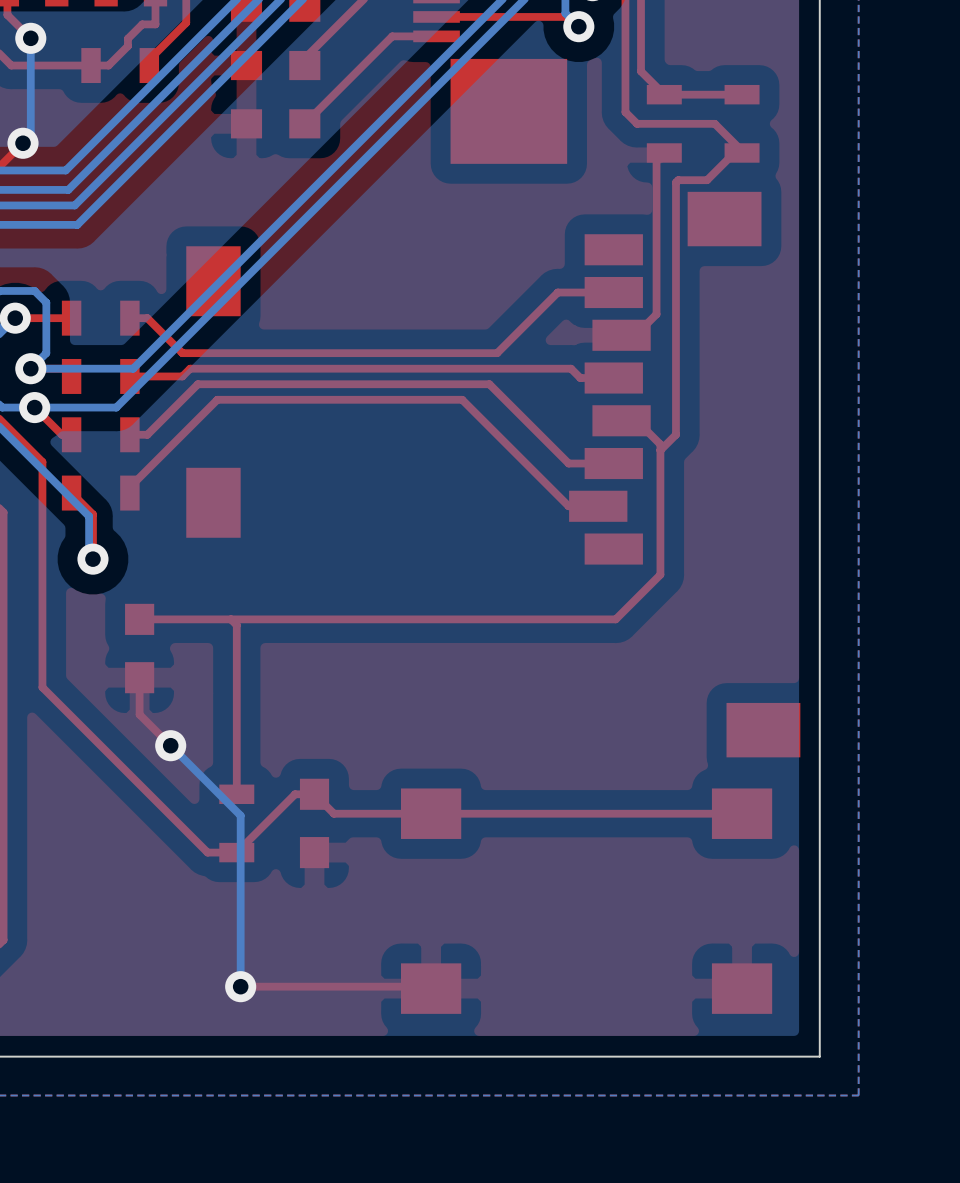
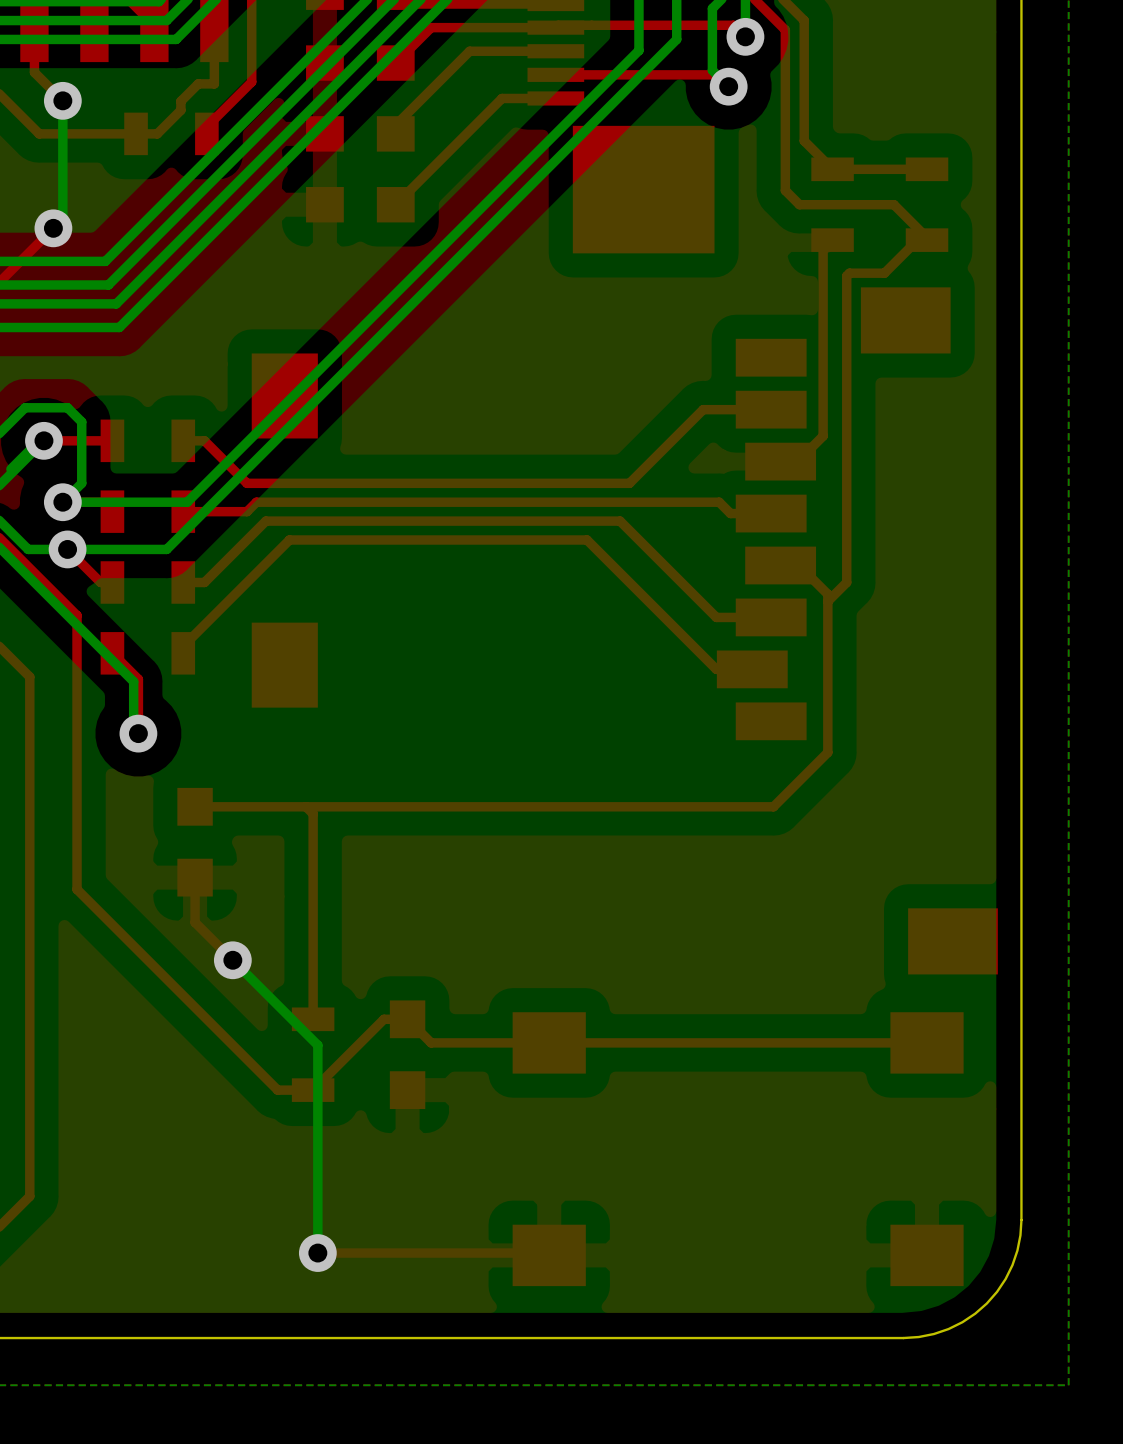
board edge: (819, 959) (819, 1056) (722, 1056) -> (1021, 1219) (1020, 1235) (1012, 1265) (997, 1291) (986, 1303) (962, 1322) (948, 1329) (918, 1337) (903, 1338)

